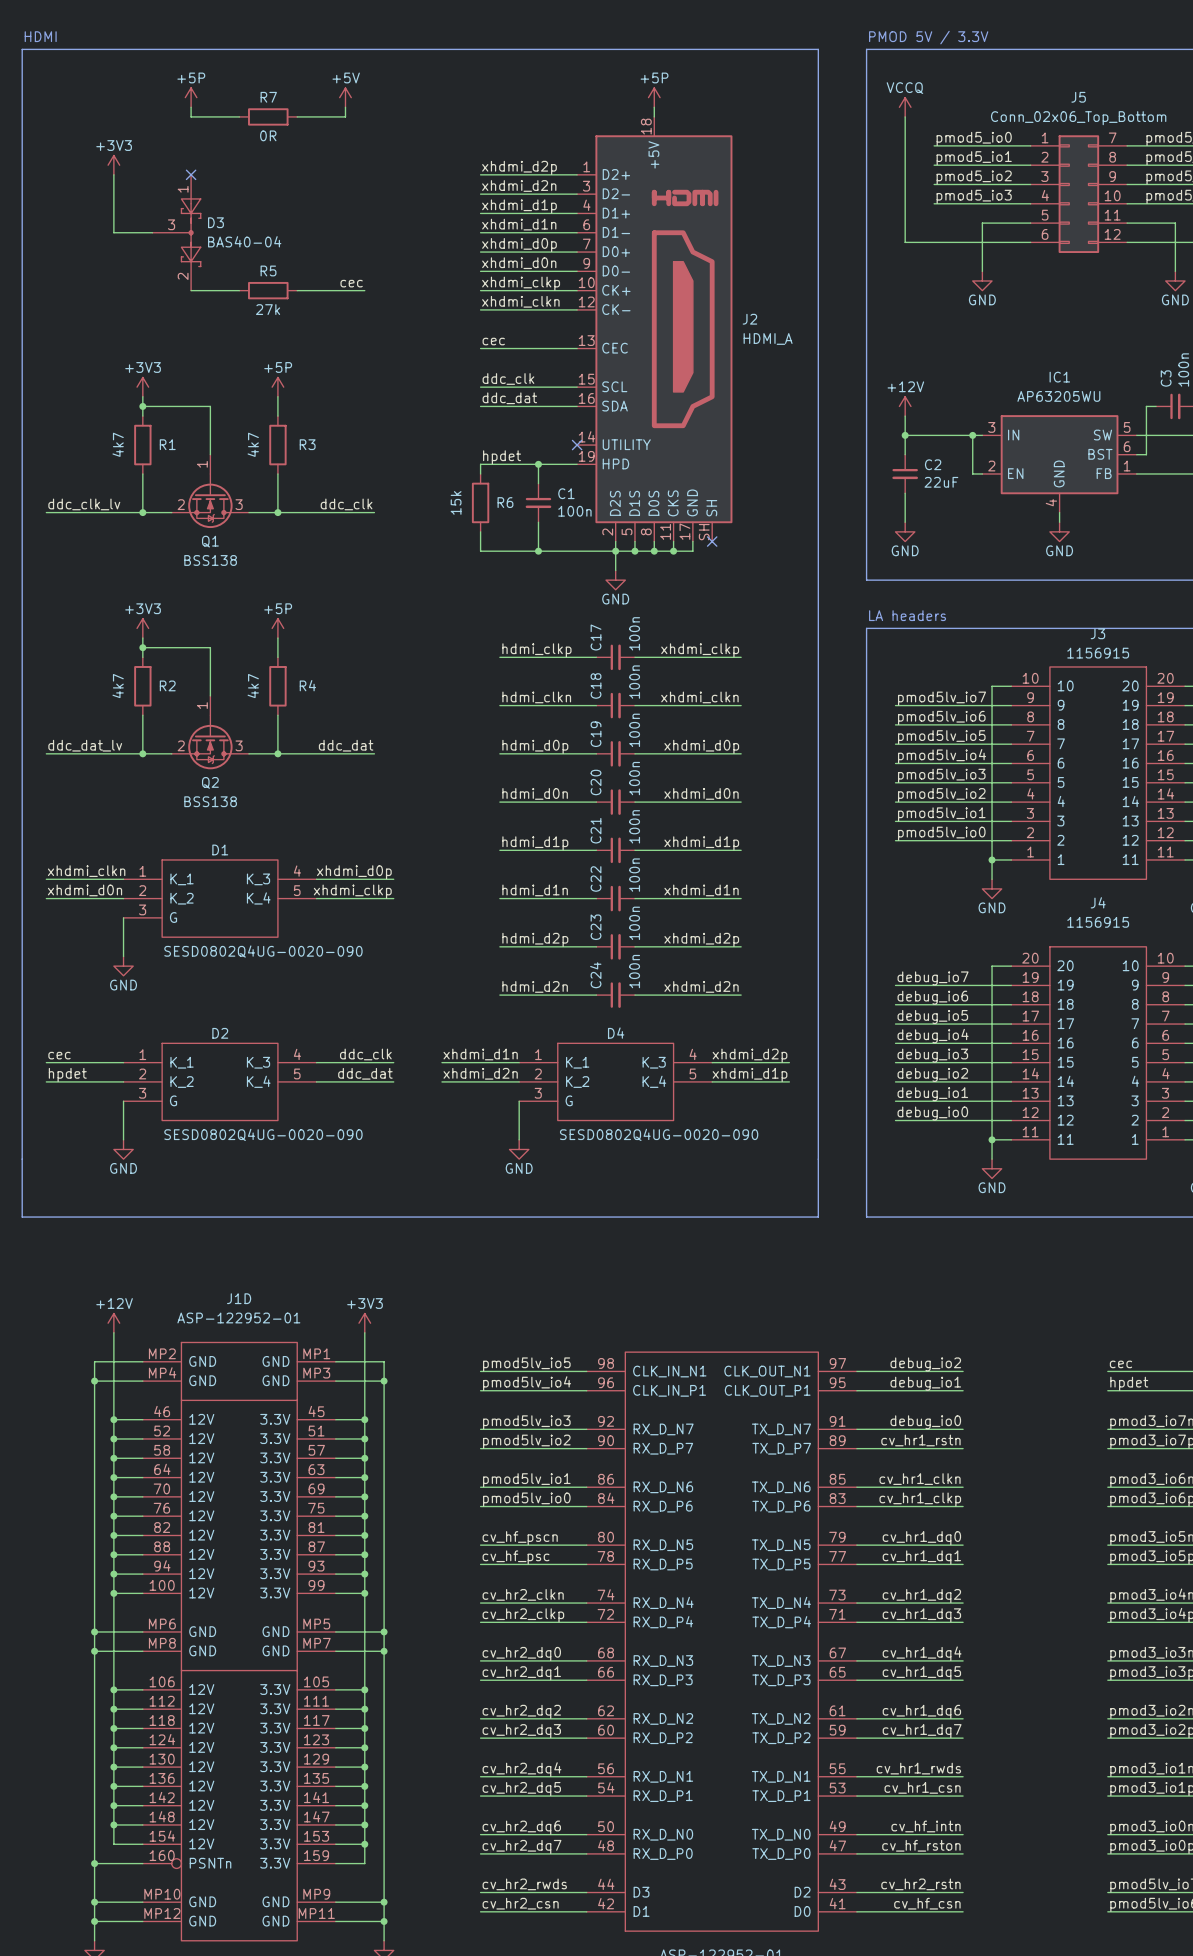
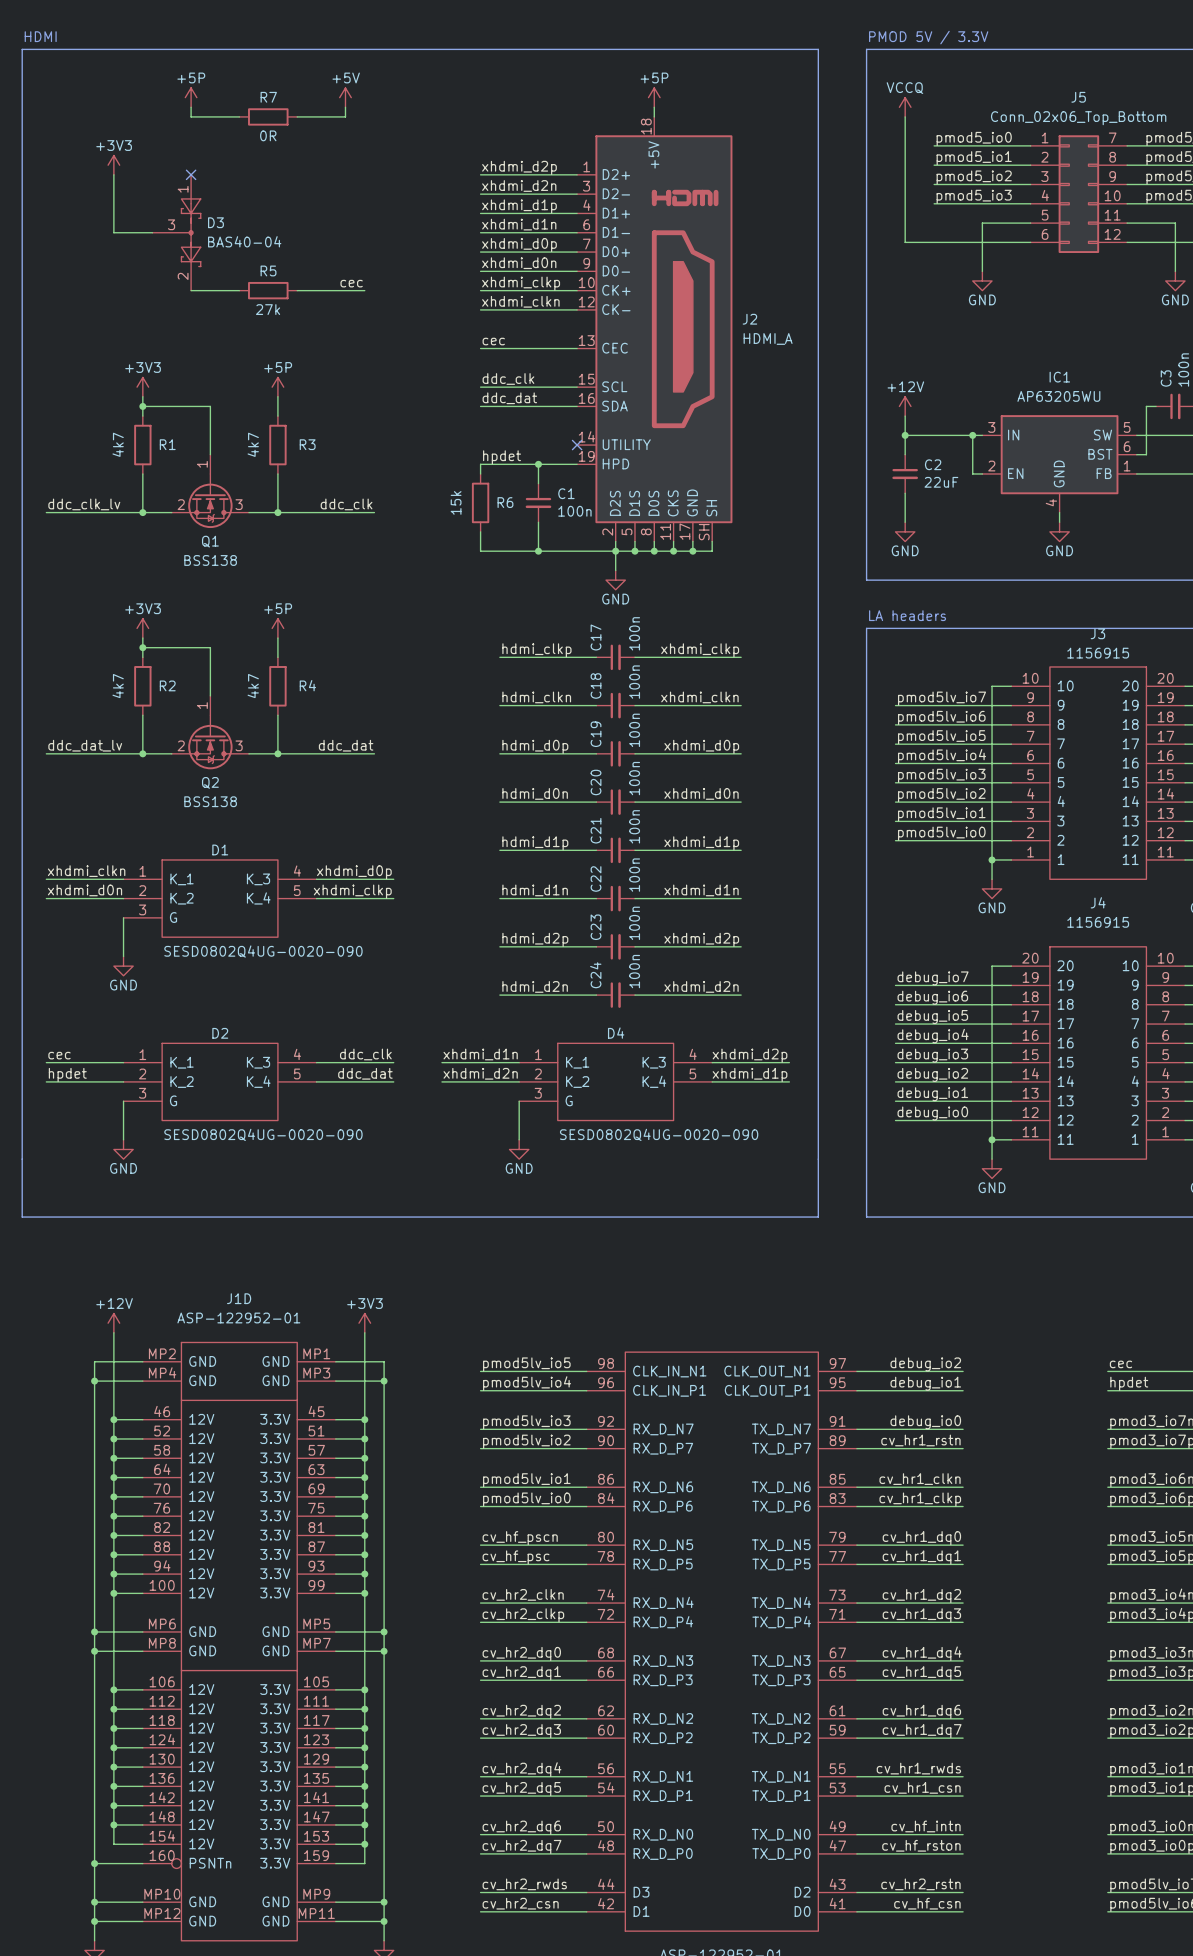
wire: none -> (712, 541) (712, 551) (692, 551)
no-connect mark: (712, 541) -> none
junction: none -> (692, 551)

